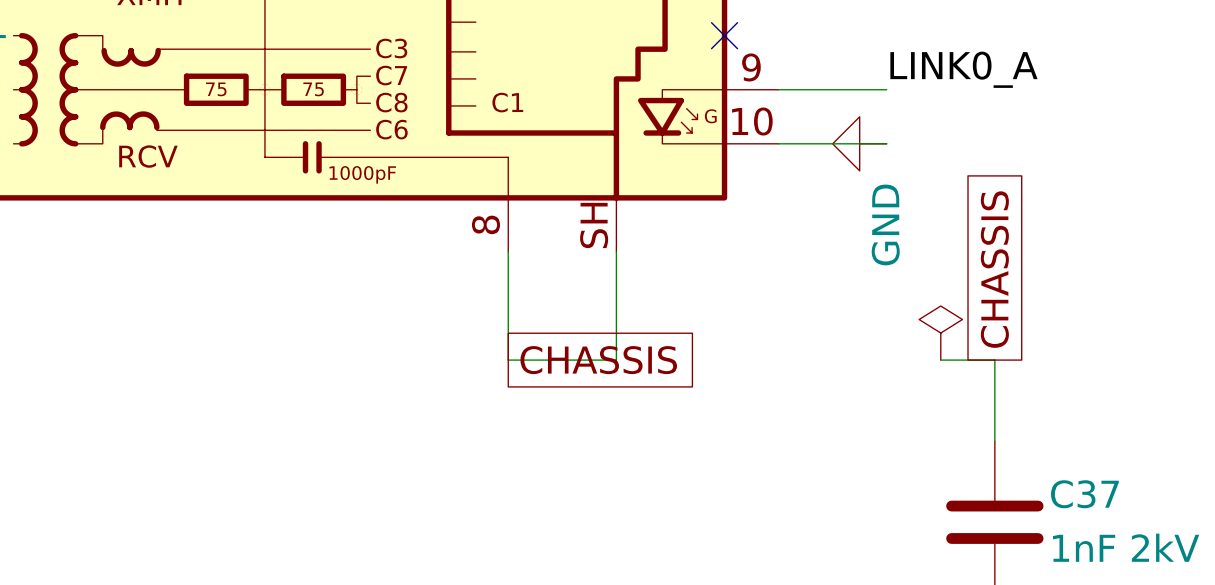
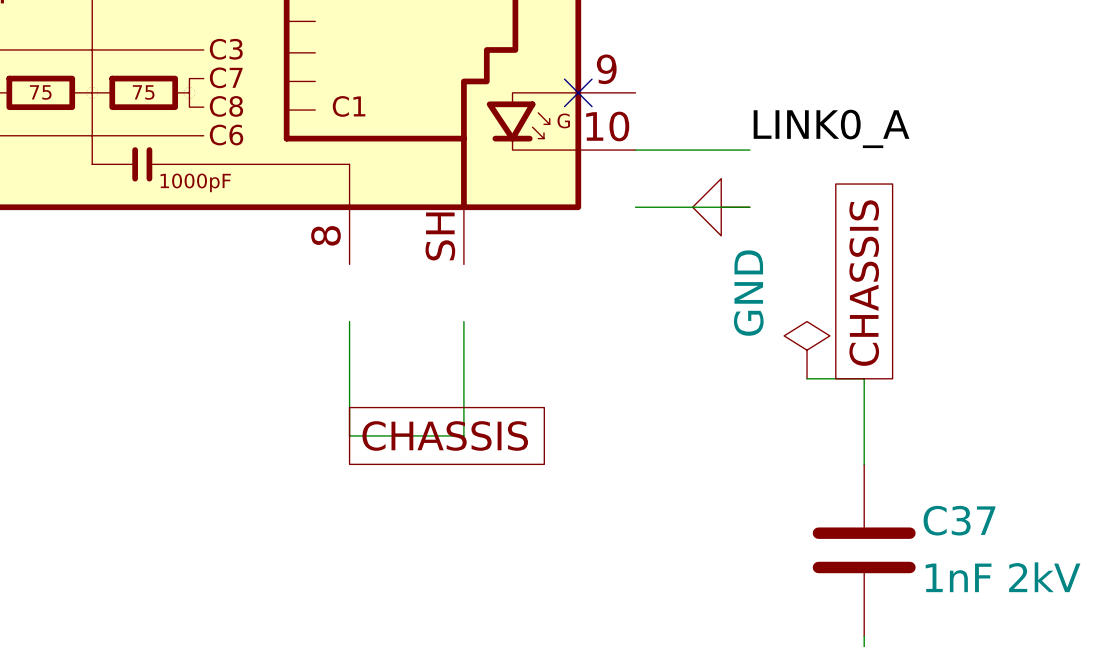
no-connect mark: (724, 35) -> none
label position: LINK0_A (963, 69) -> LINK0_A (831, 128)
no-connect mark: none -> (578, 92)
wire: (778, 89) (886, 89) -> (635, 207) (749, 207)
power symbol position: GND (859, 143) -> GND (721, 207)
wire: (508, 251) (508, 306) -> none
wire: (616, 251) (616, 306) -> none
wire: (508, 360) (616, 360) -> (349, 378) (349, 435) (463, 435) (463, 378)
global label position: CHASSIS (598, 360) -> CHASSIS (445, 435)

